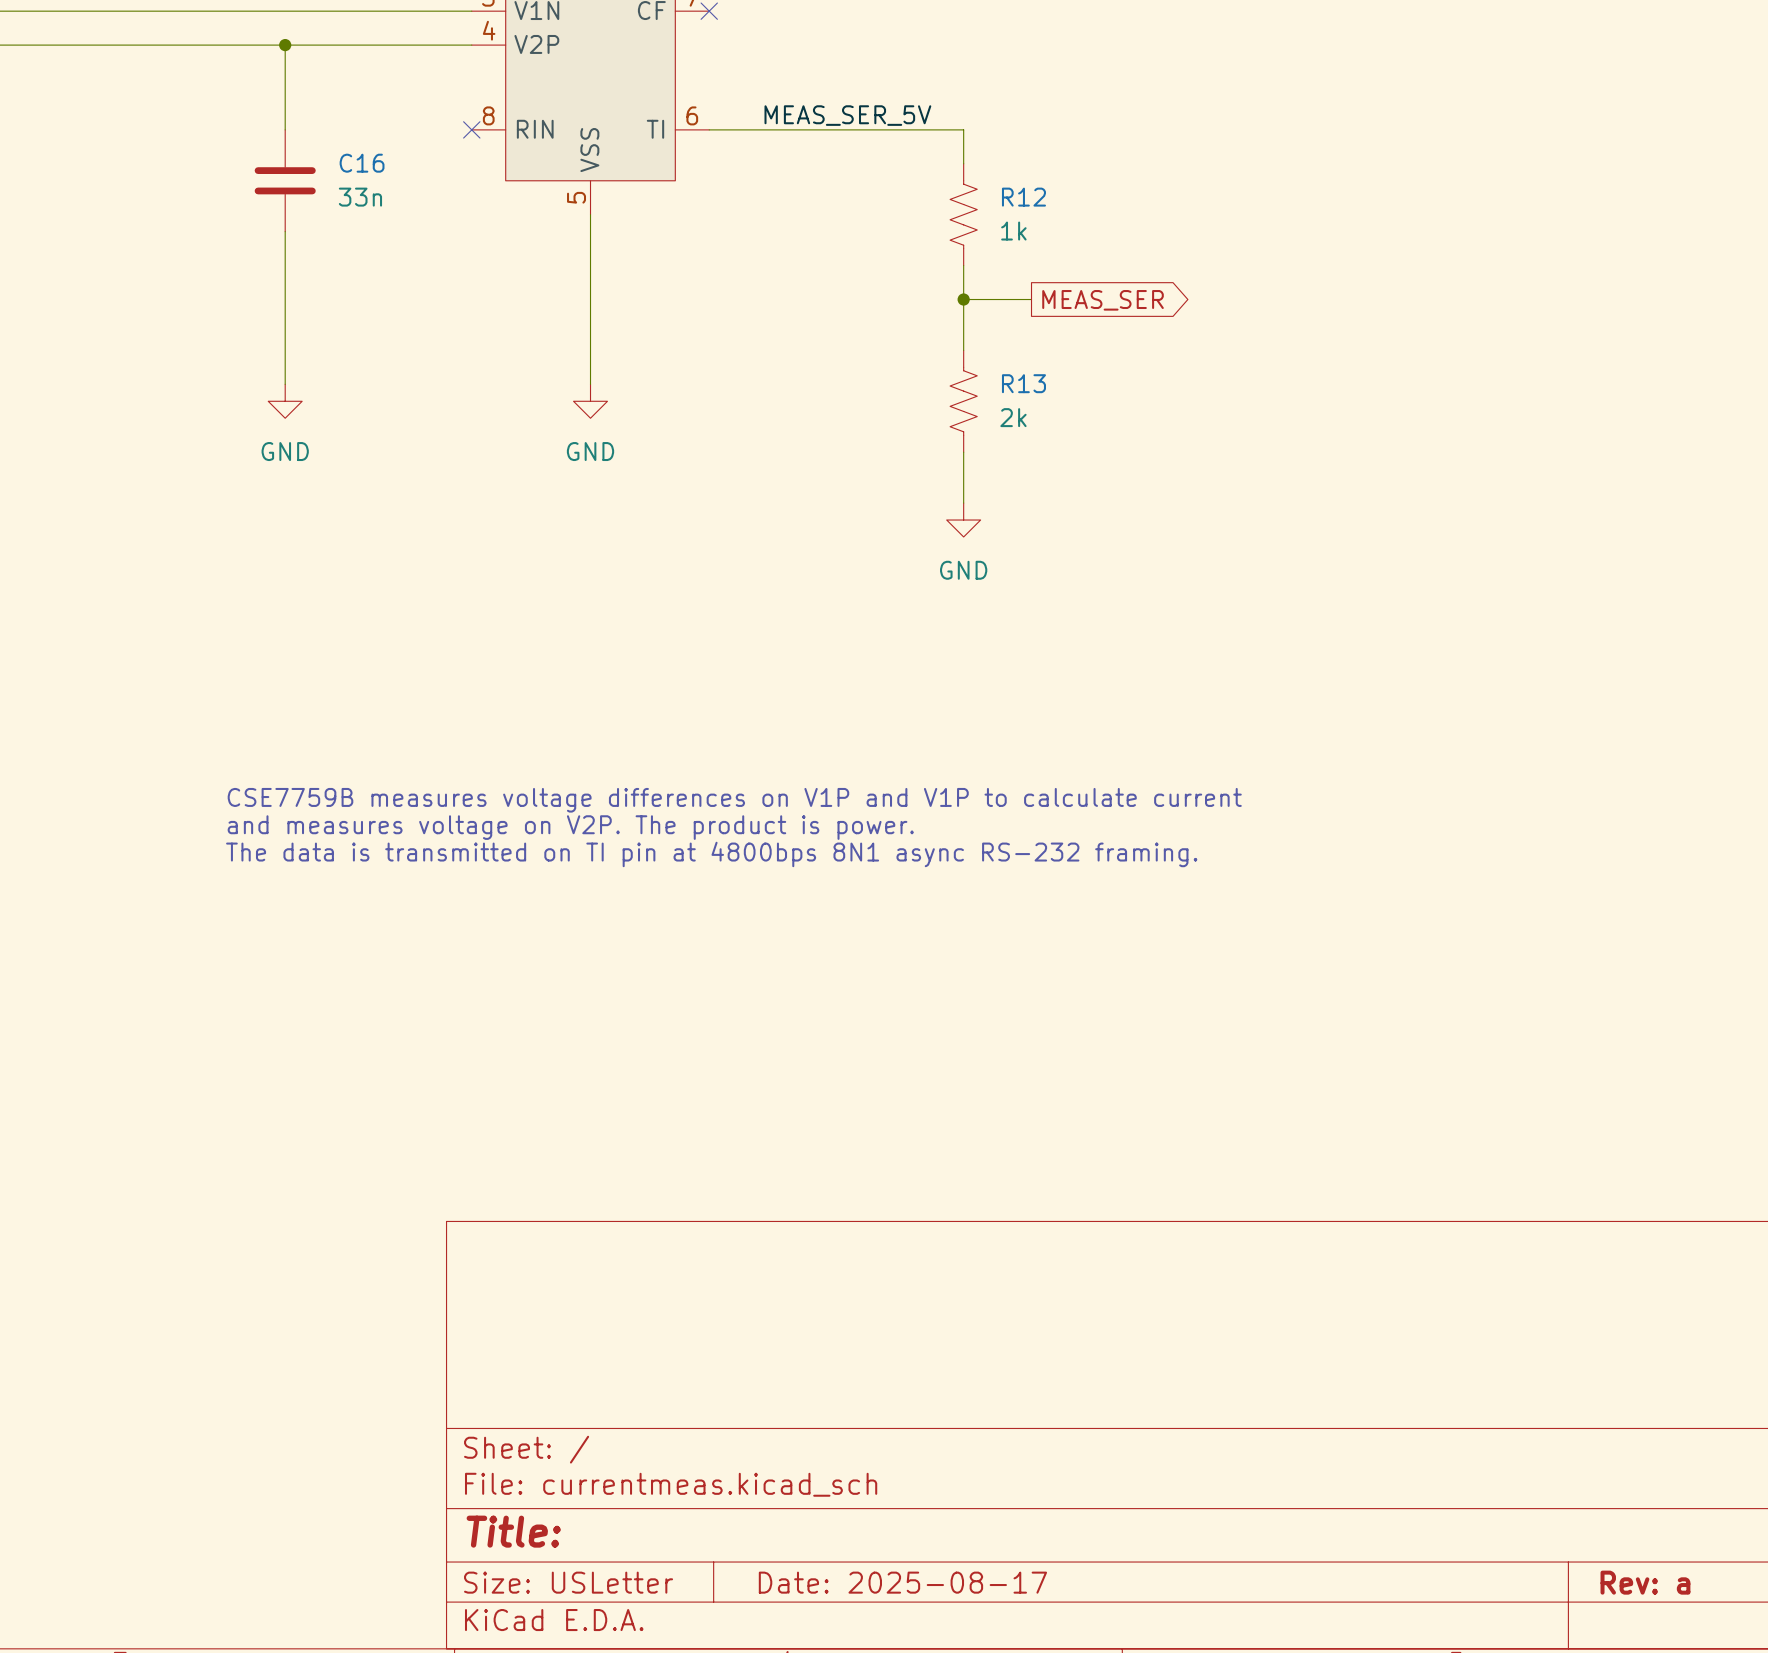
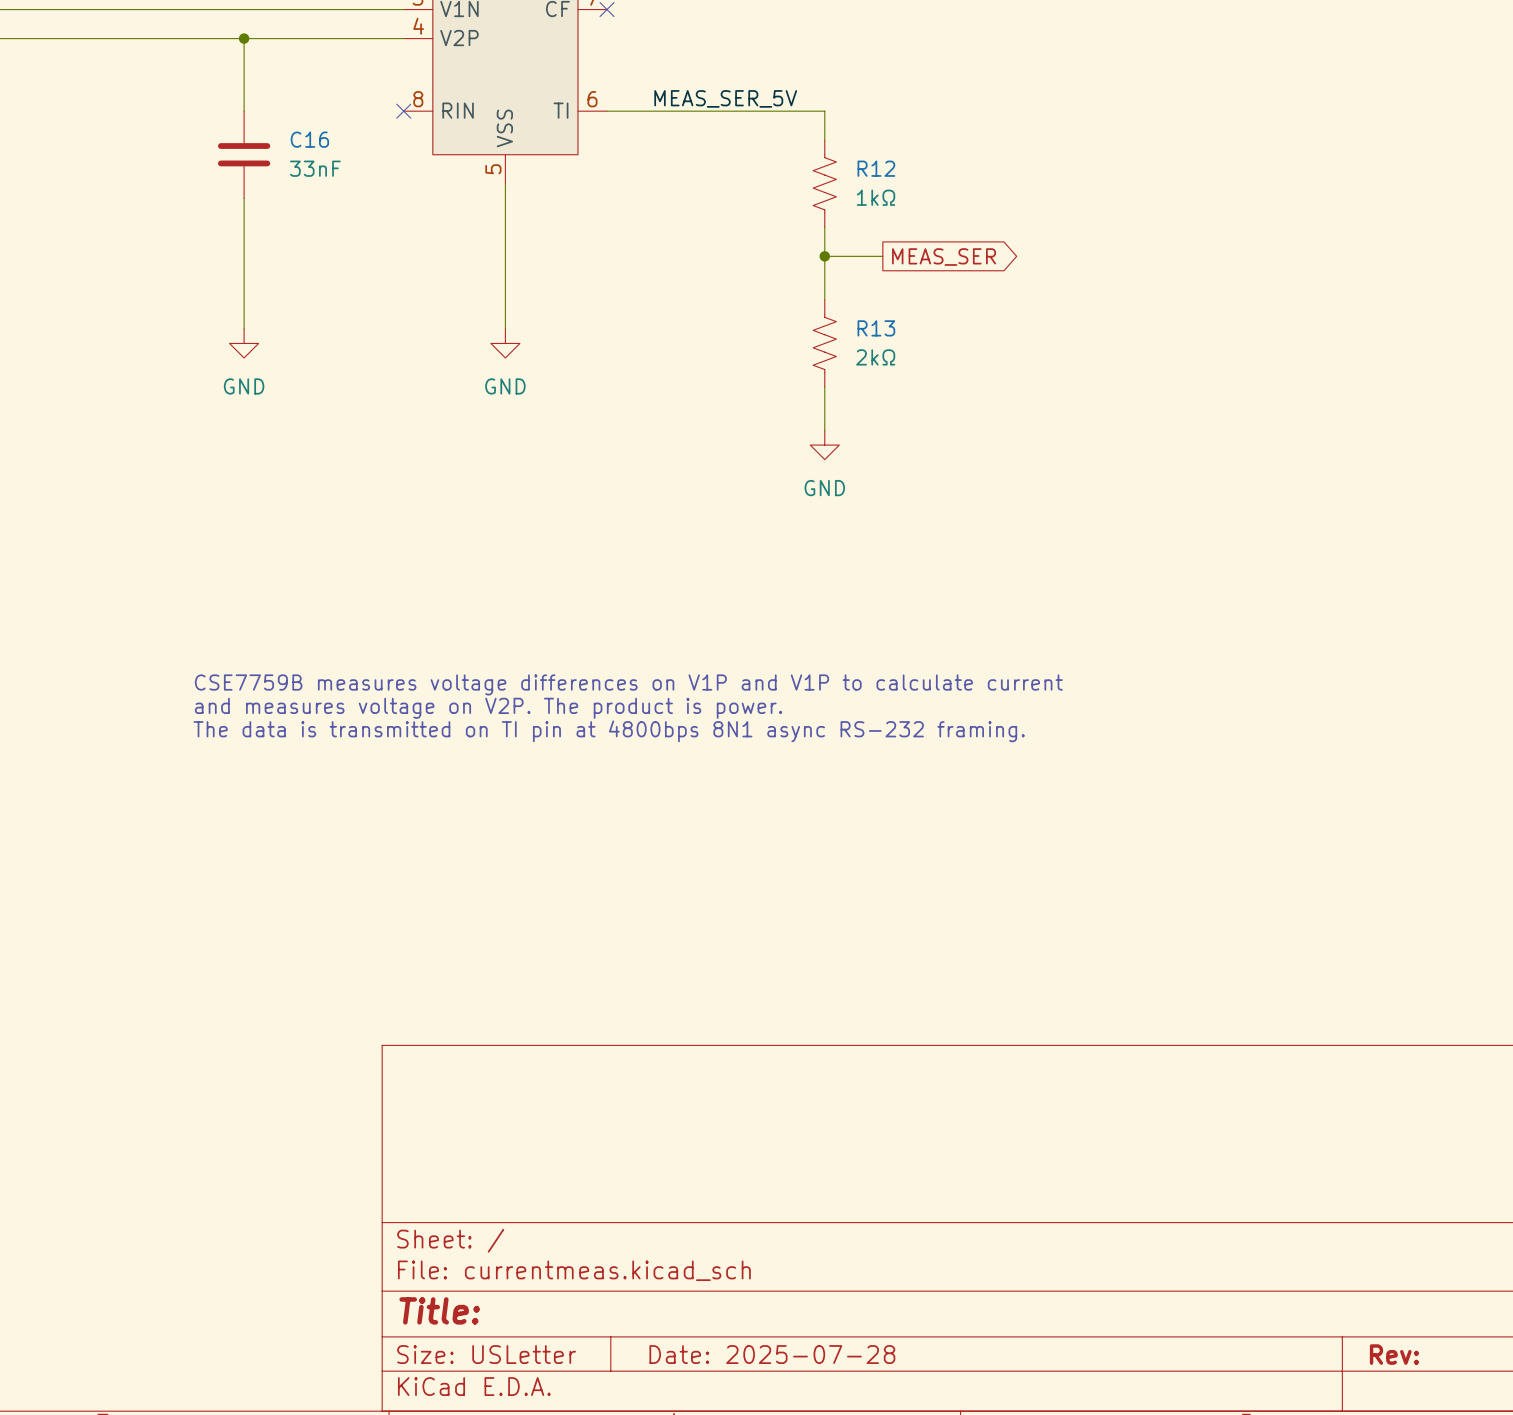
C16 value: 33n (360, 197) -> 33nF (315, 168)
R12 value: 1k (1013, 231) -> 1kΩ (876, 197)
R13 value: 2k (1013, 417) -> 2kΩ (875, 357)
title block: Date: 2025-08-17 (902, 1582) -> Date: 2025-07-28 (772, 1354)
title block: Rev: a (1645, 1582) -> Rev: (1394, 1354)

